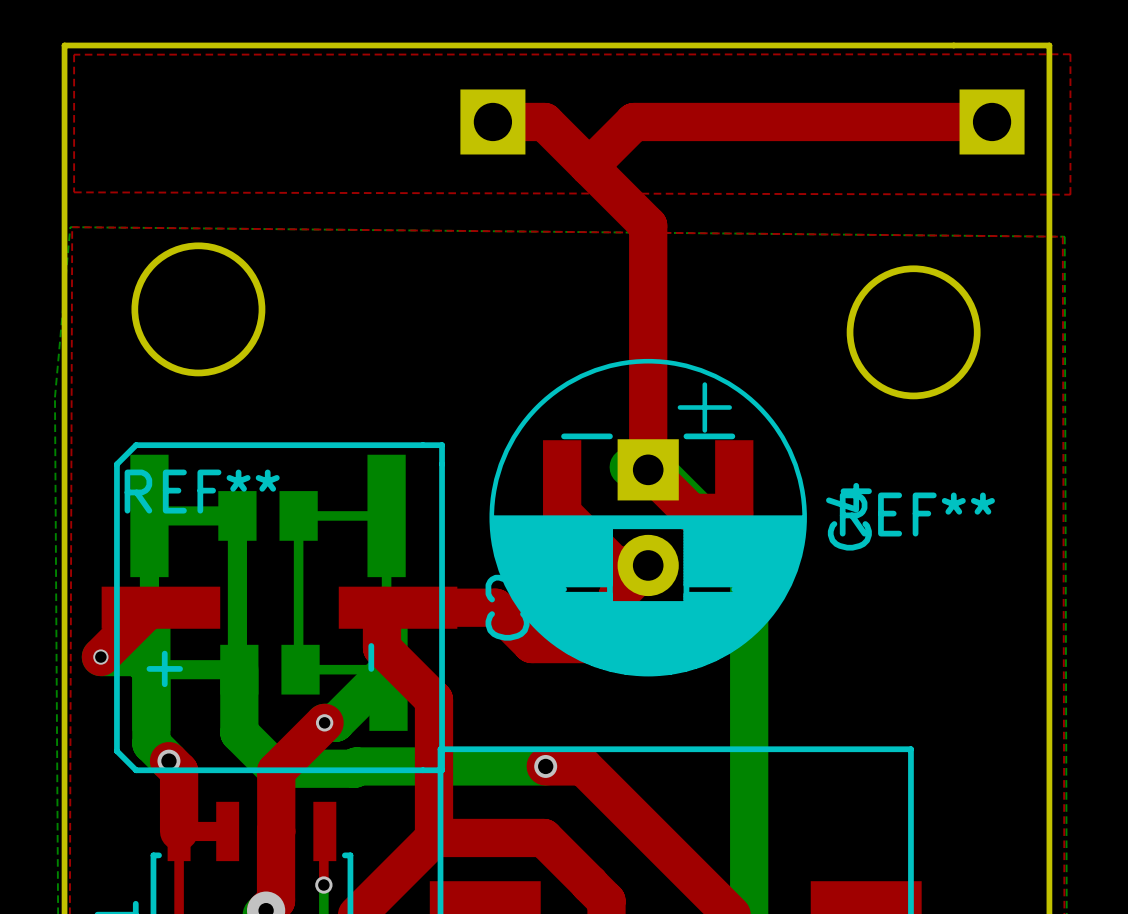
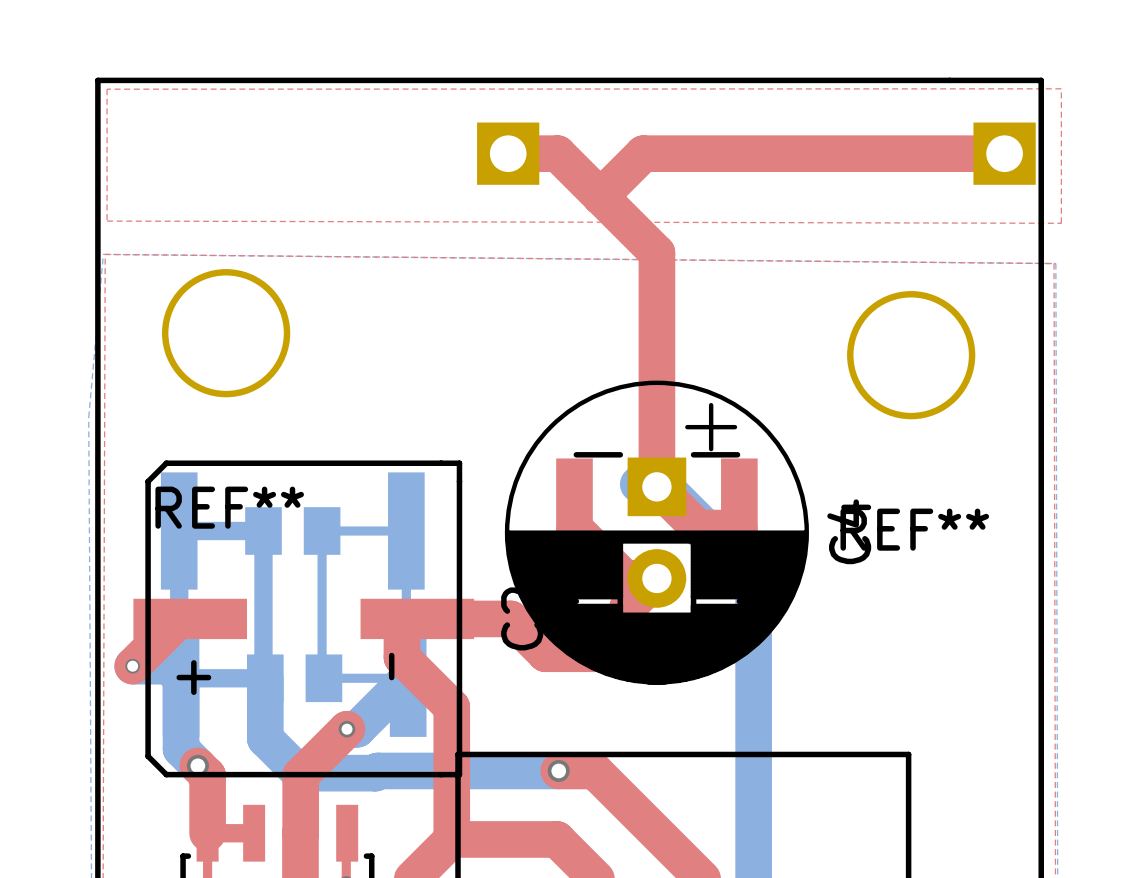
part position: (992, 121) -> (1004, 153)

